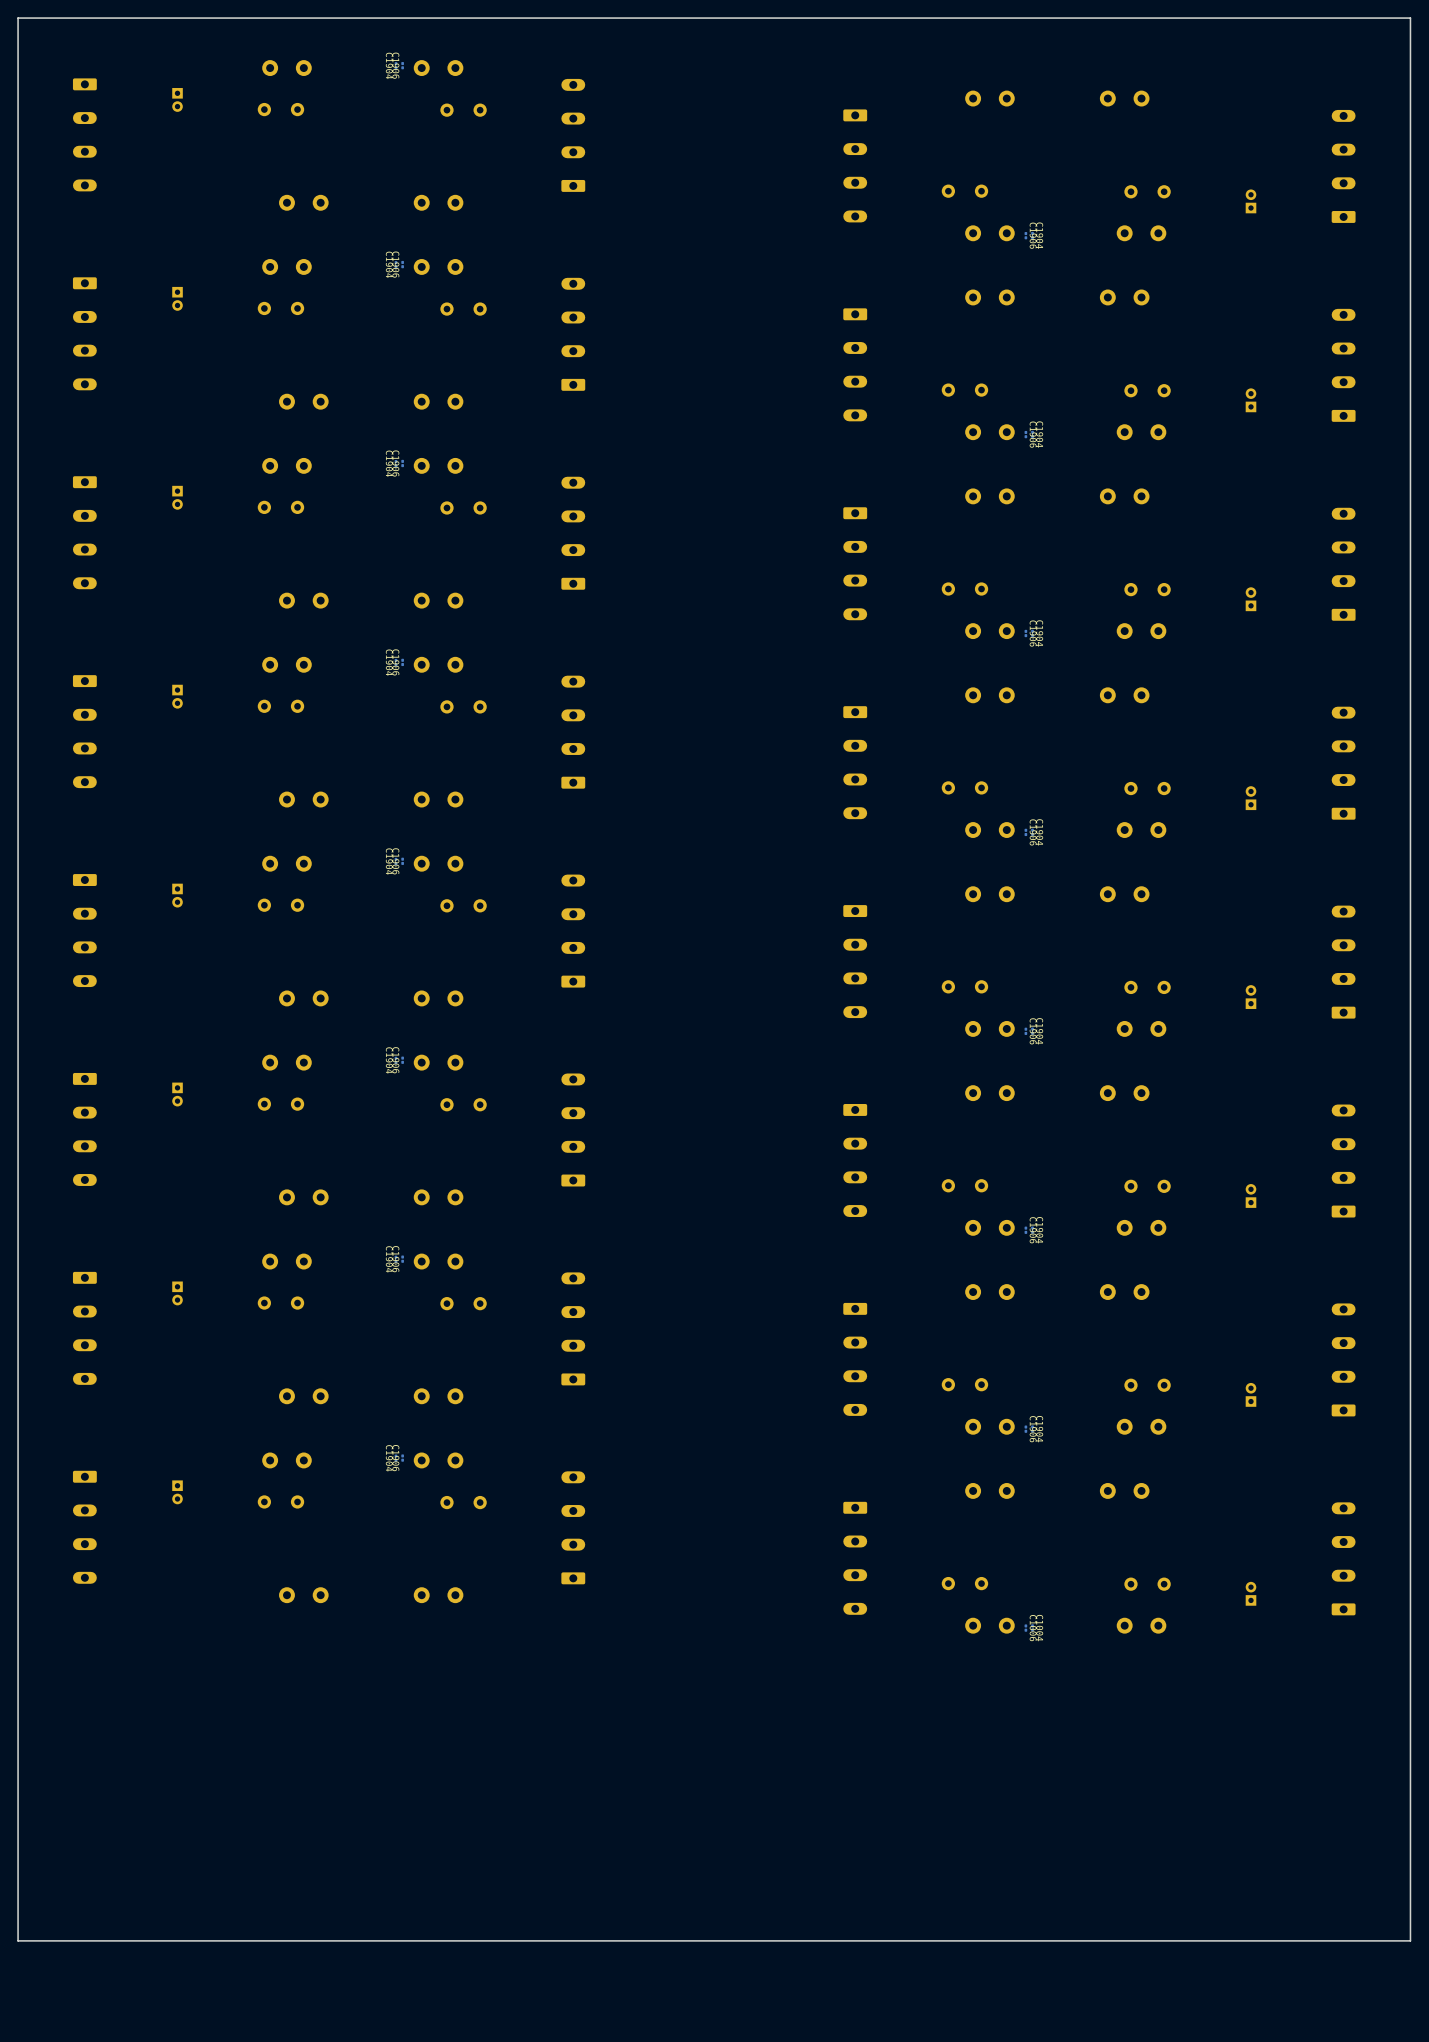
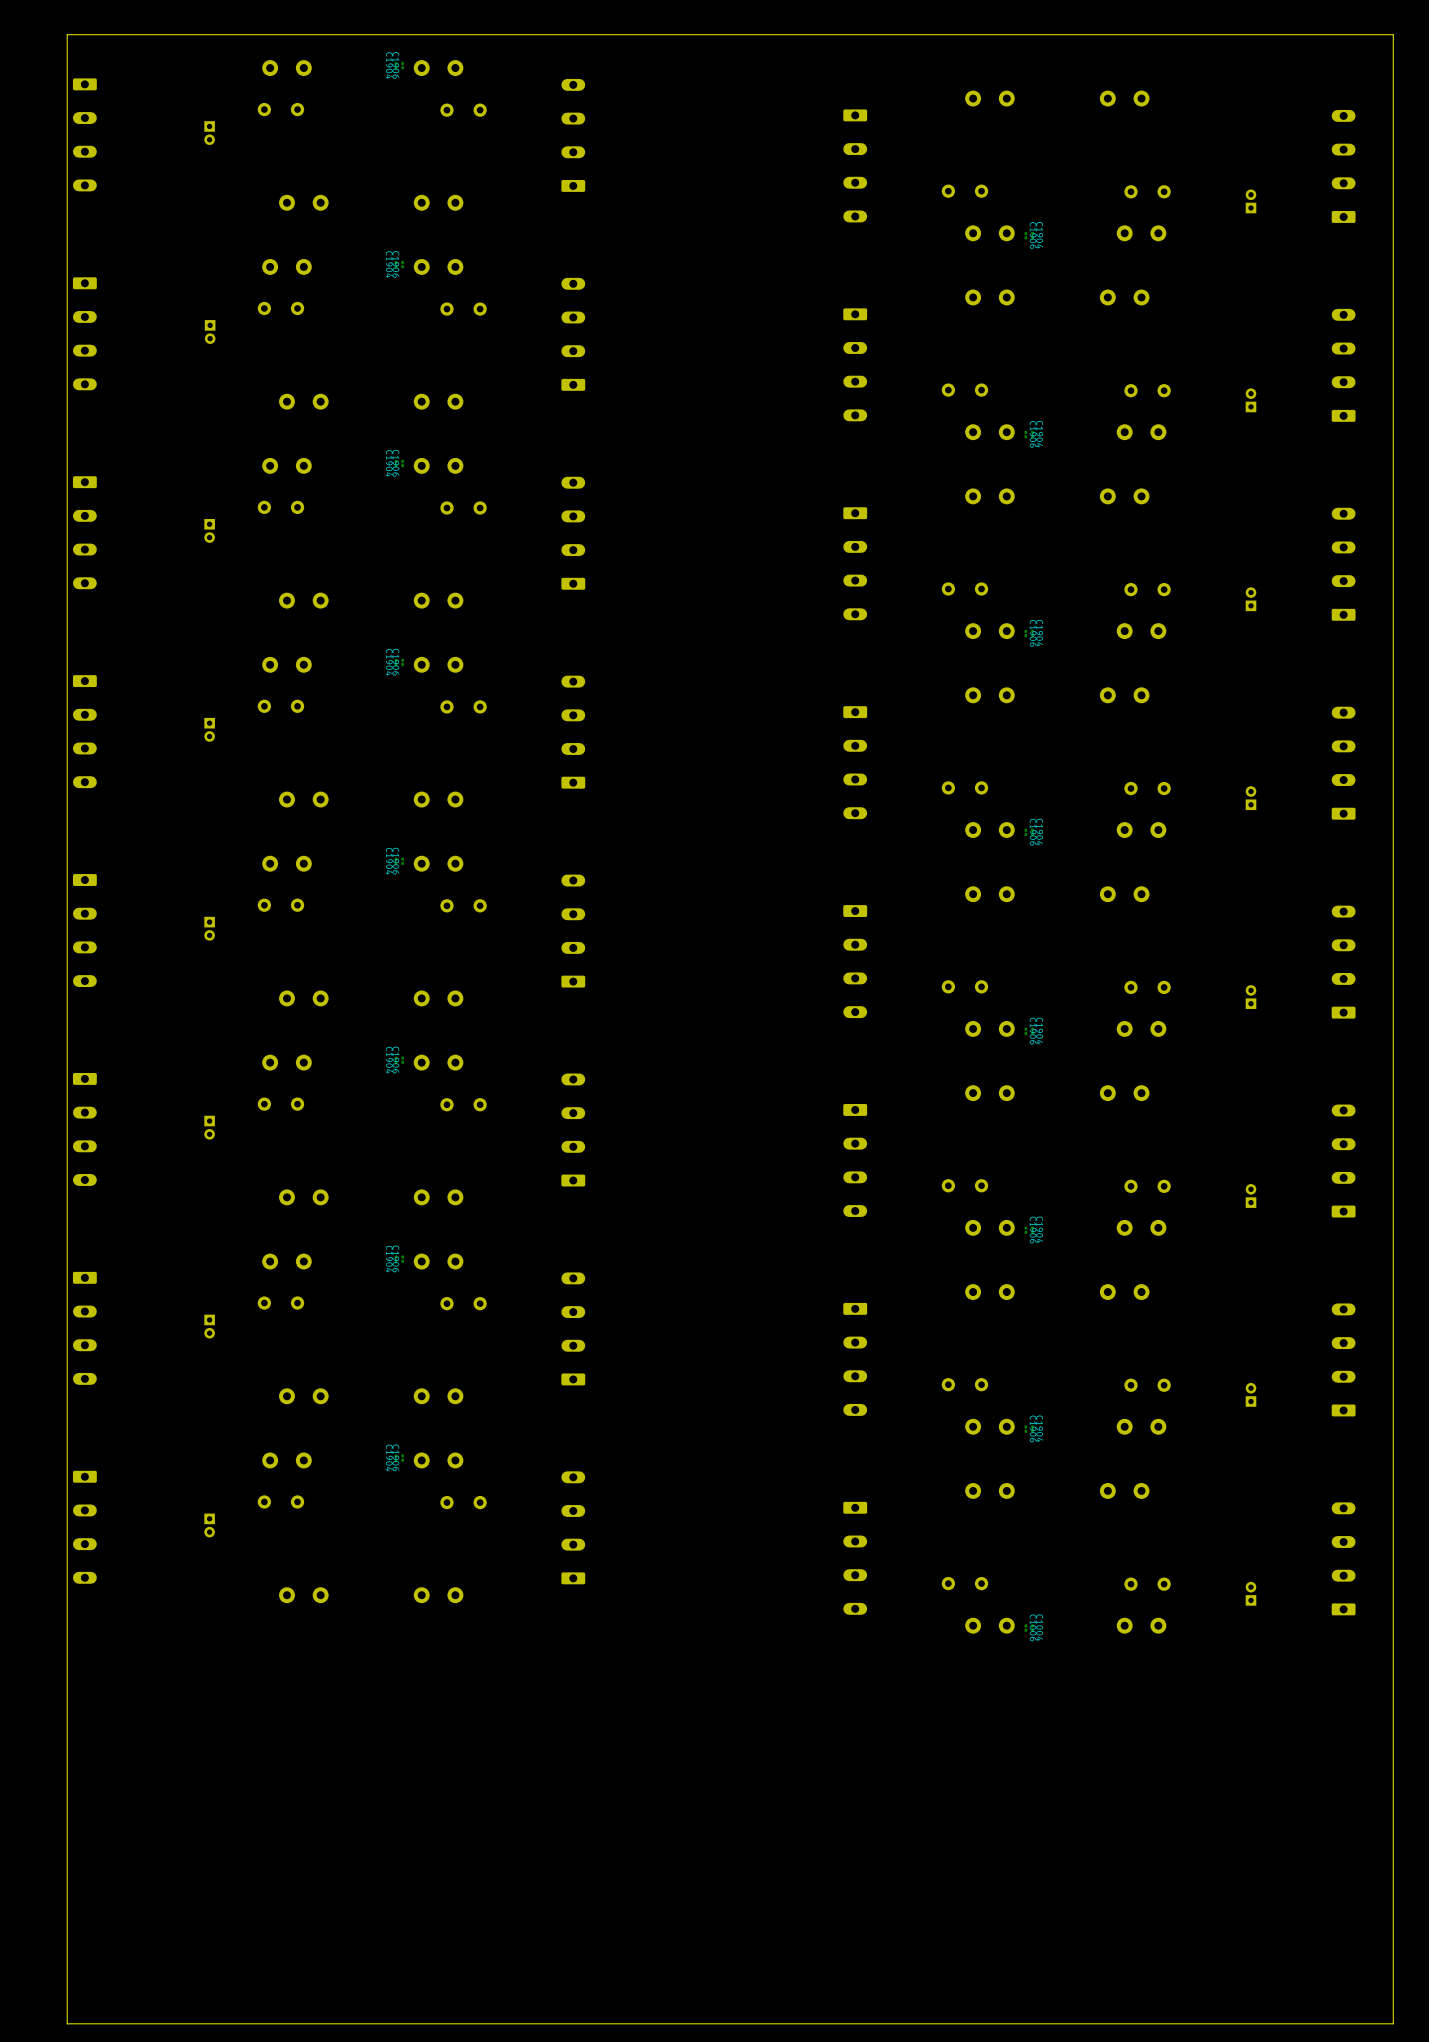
board edge: (1410, 18) (1410, 1940) (18, 1940) (18, 18) (1410, 18) -> (1393, 34) (1393, 2023) (67, 2023) (67, 34) (1393, 34)
part position: (177, 99) -> (209, 133)
part position: (177, 298) -> (210, 332)
part position: (177, 497) -> (209, 530)
part position: (177, 696) -> (209, 729)
part position: (177, 895) -> (209, 928)
part position: (177, 1094) -> (209, 1127)
part position: (177, 1293) -> (209, 1326)
part position: (177, 1492) -> (209, 1525)

